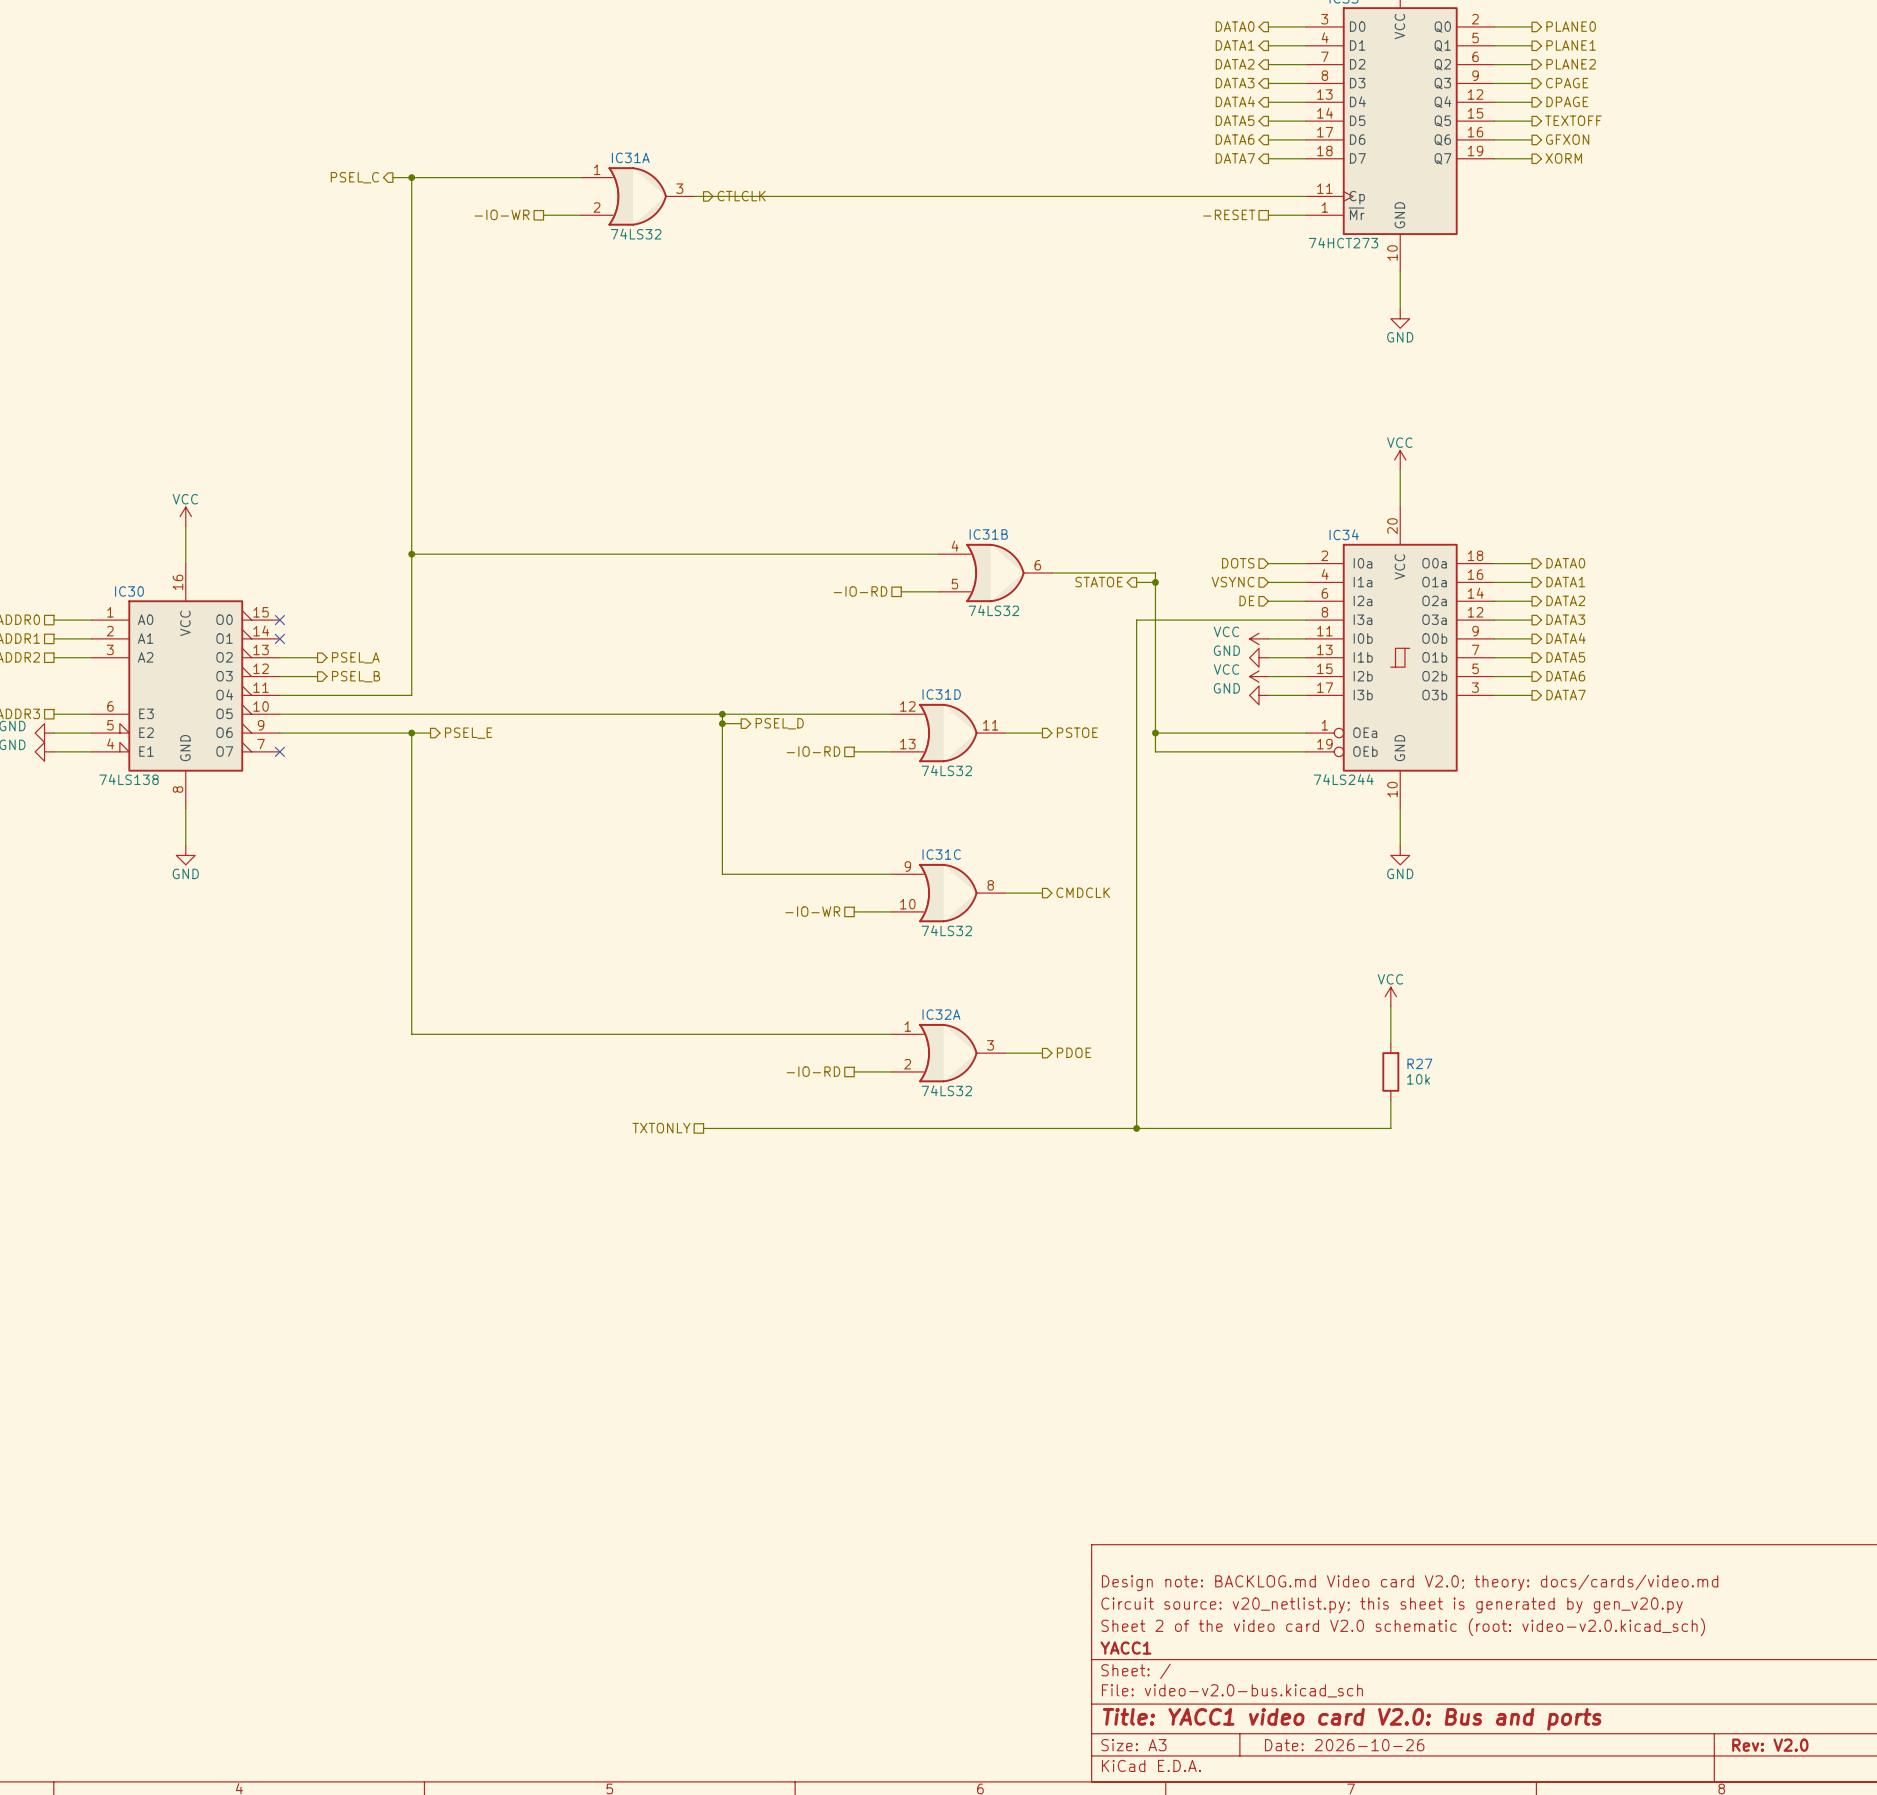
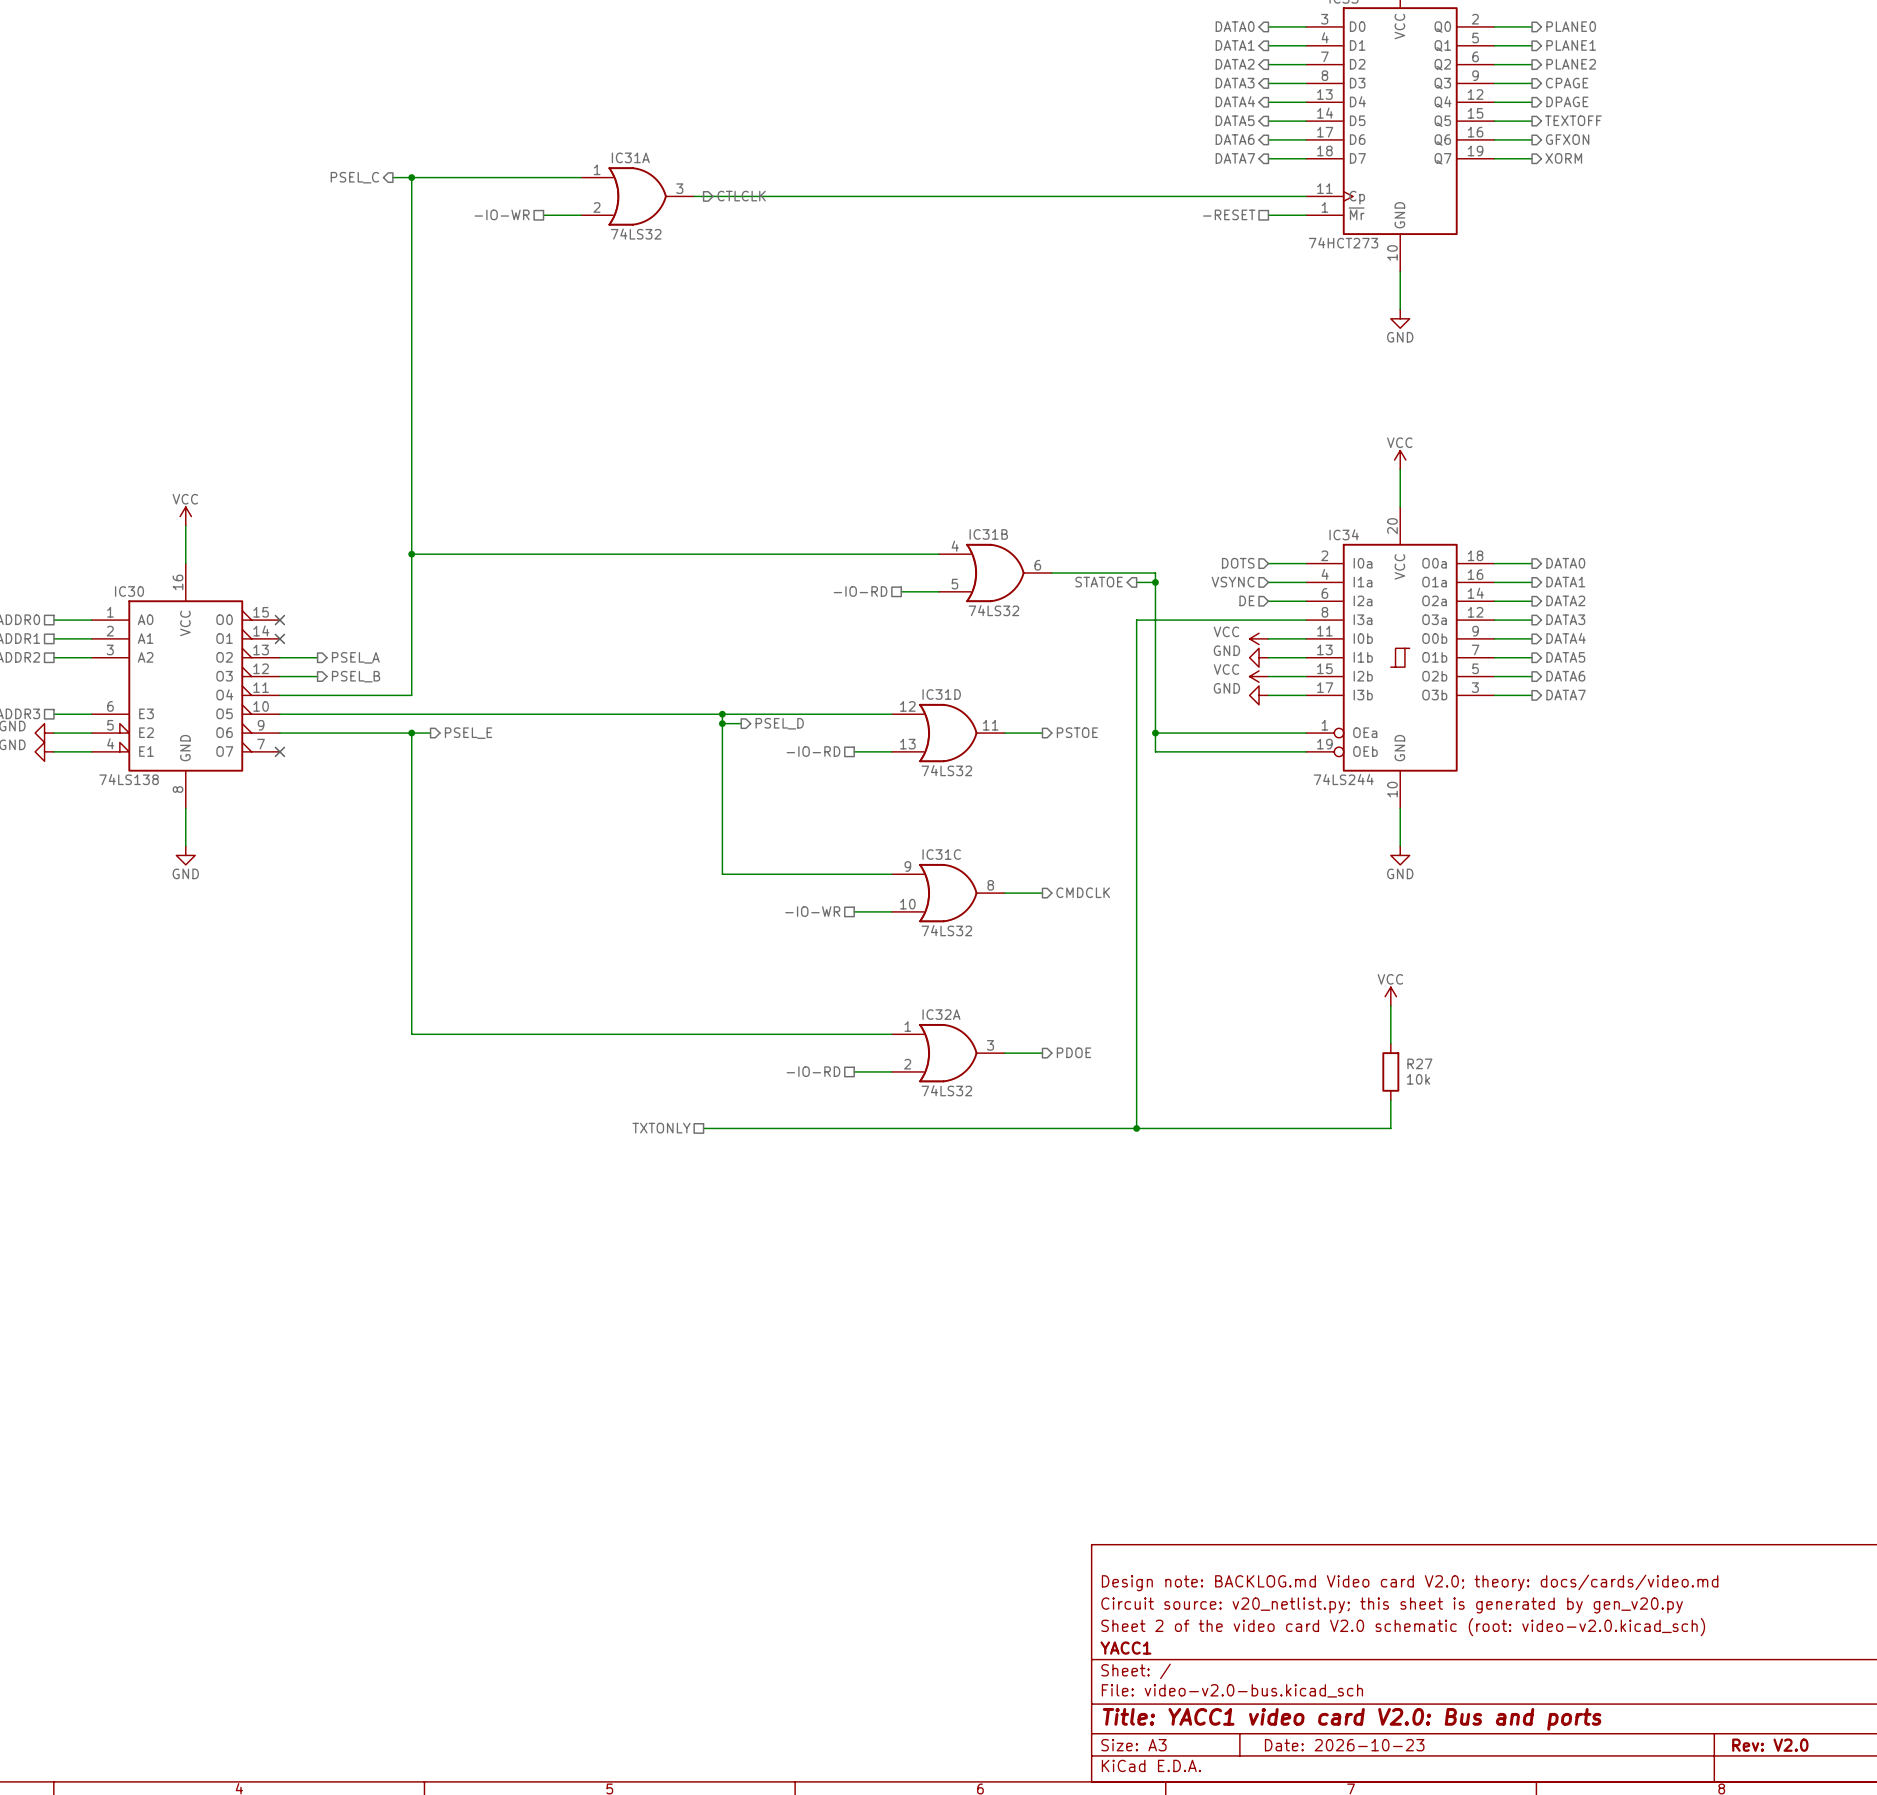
title block: Date: 2026-10-26 (1344, 1745) -> Date: 2026-10-23 (1344, 1745)

